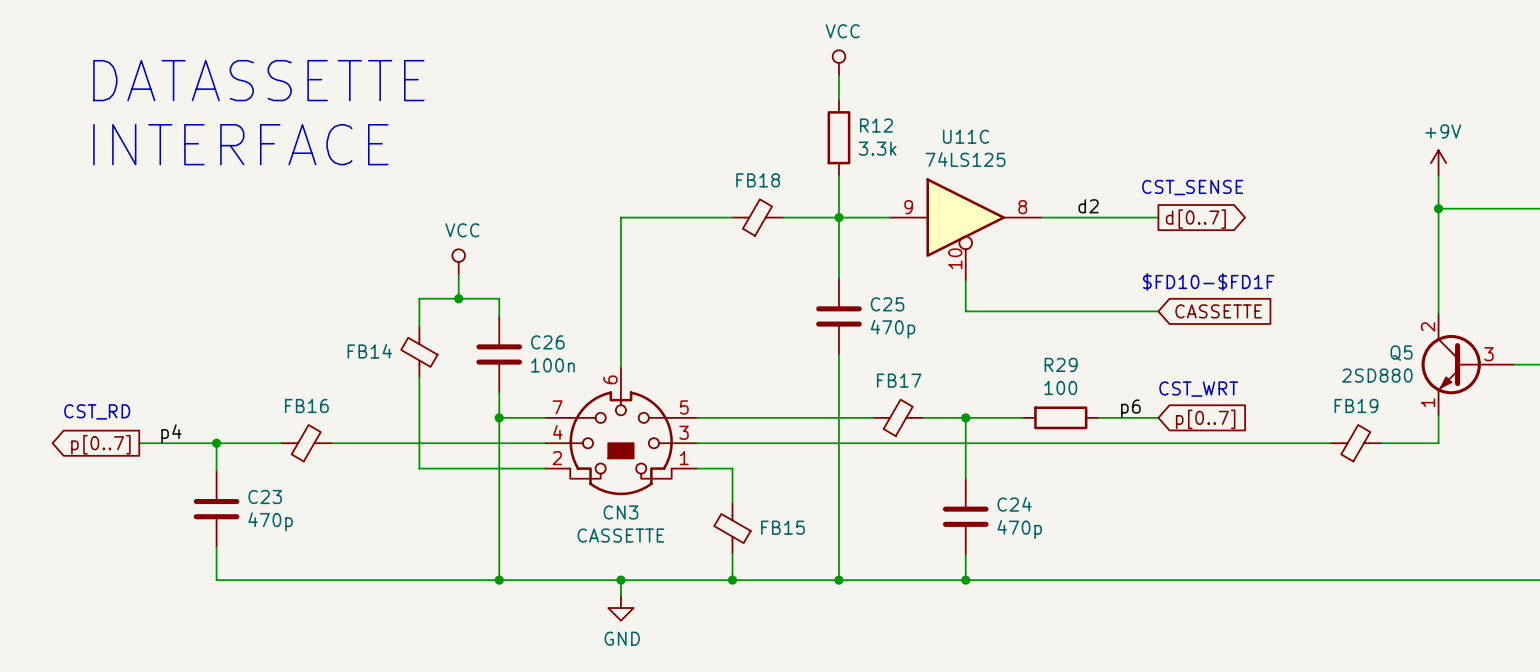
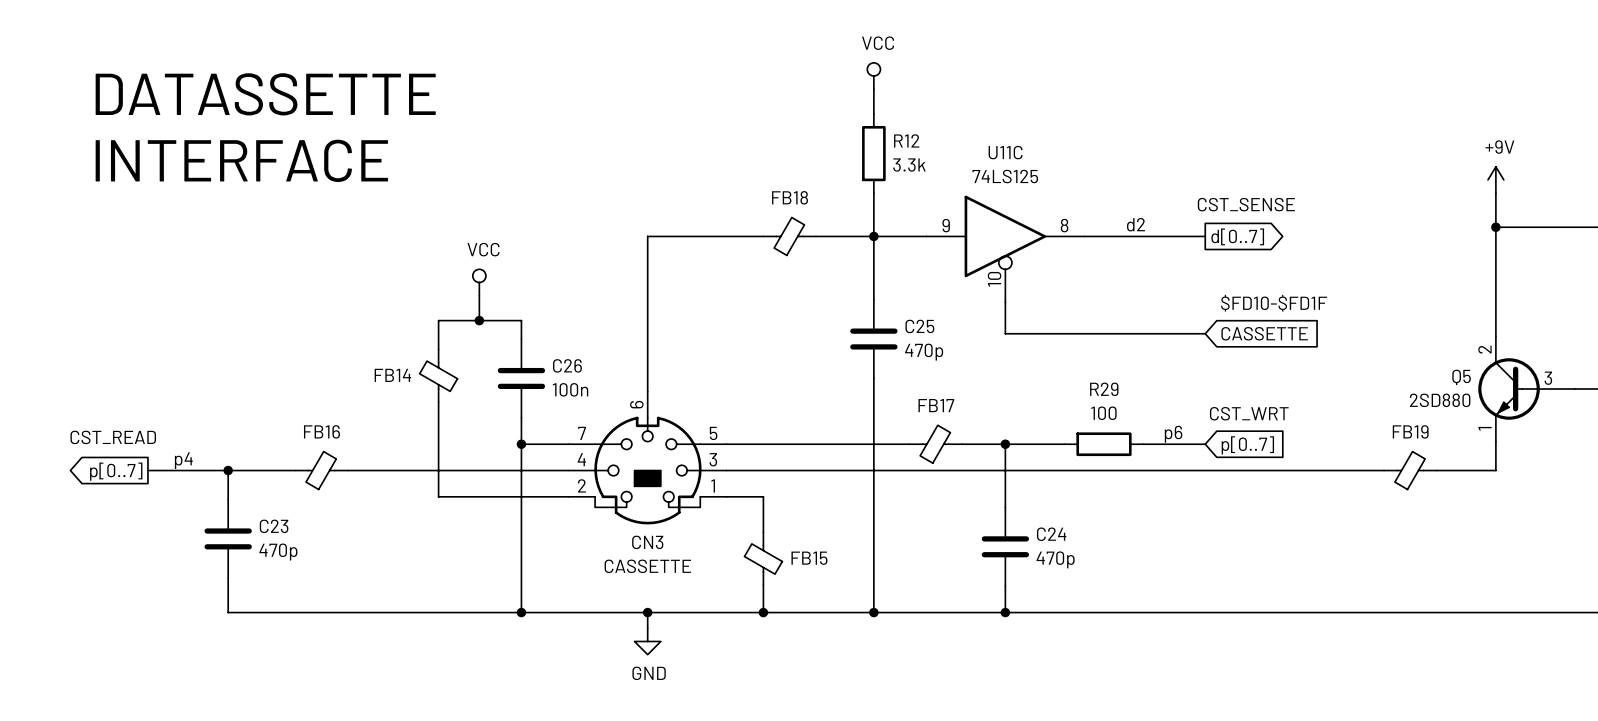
text: CST_RD (97, 411) -> CST_READ (113, 437)

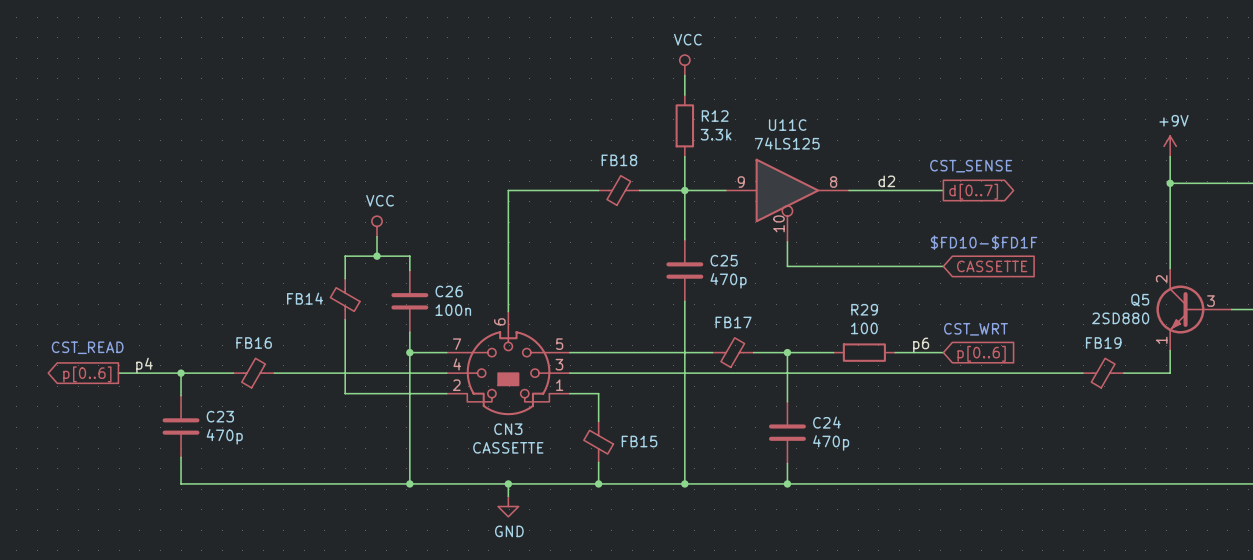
text: DATASSETTE (265, 94) -> none
text: INTERFACE (241, 160) -> none
global label: p[0..7] (1247, 445) -> p[0..6] (981, 353)
global label: p[0..7] (116, 471) -> p[0..6] (87, 374)

